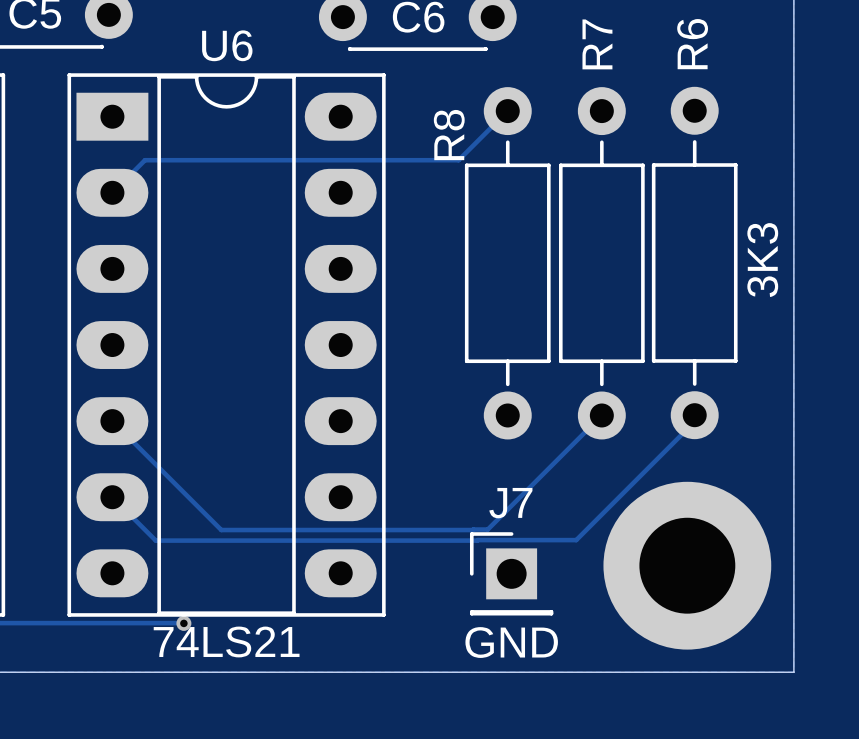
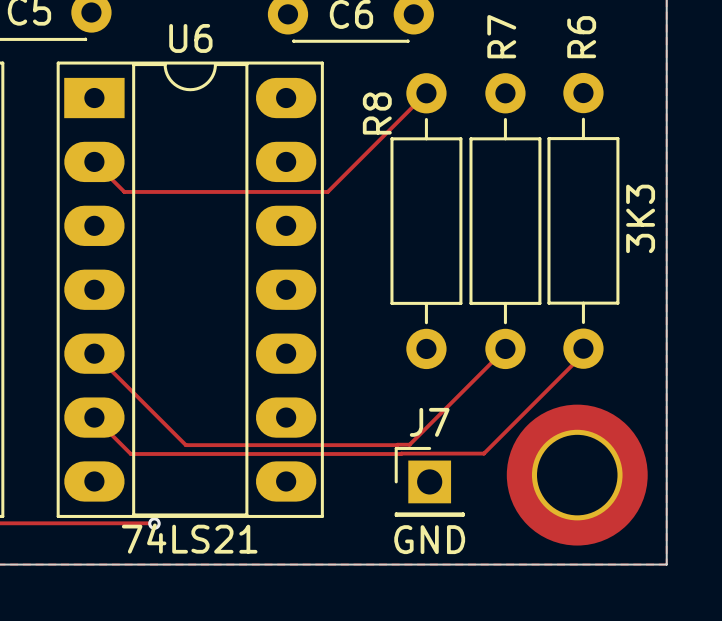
track: (458, 160) (145, 160) (112, 192) -> (385, 134) (327, 191) (124, 191) (94, 161)

